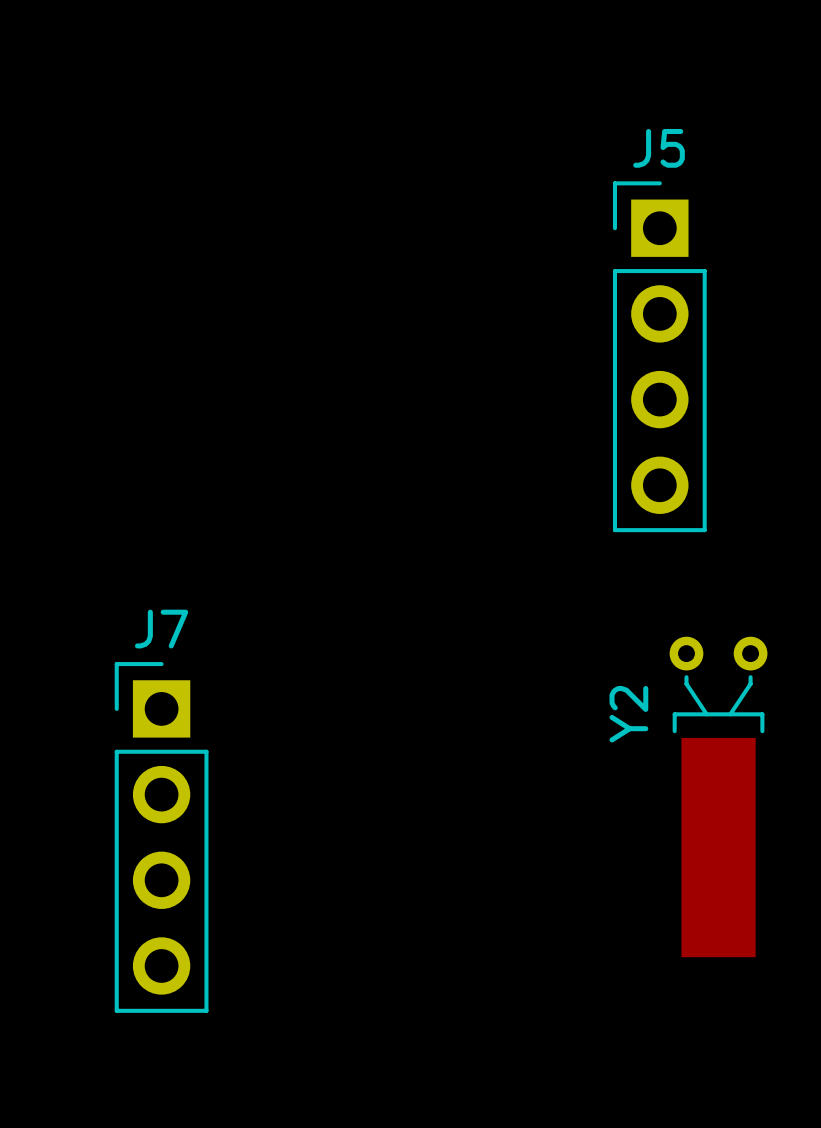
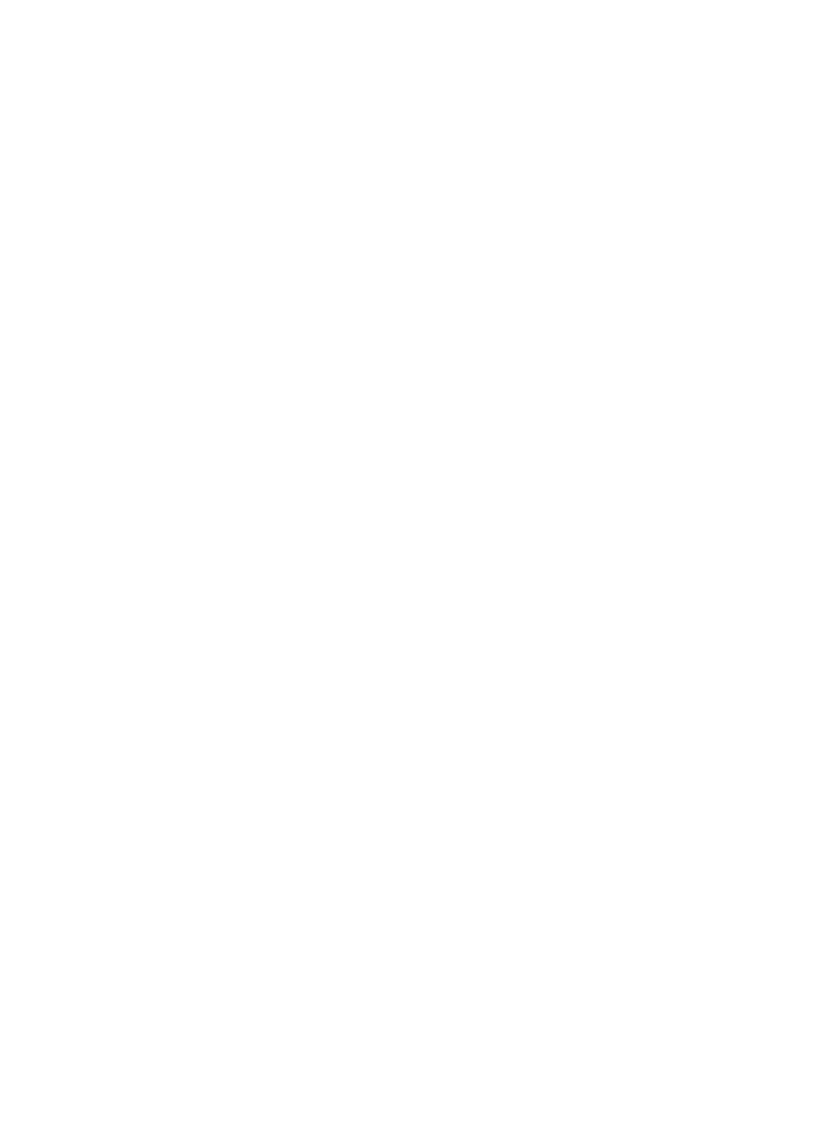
J5: (659, 356) -> none
Y2: (718, 796) -> none
J7: (161, 837) -> none

